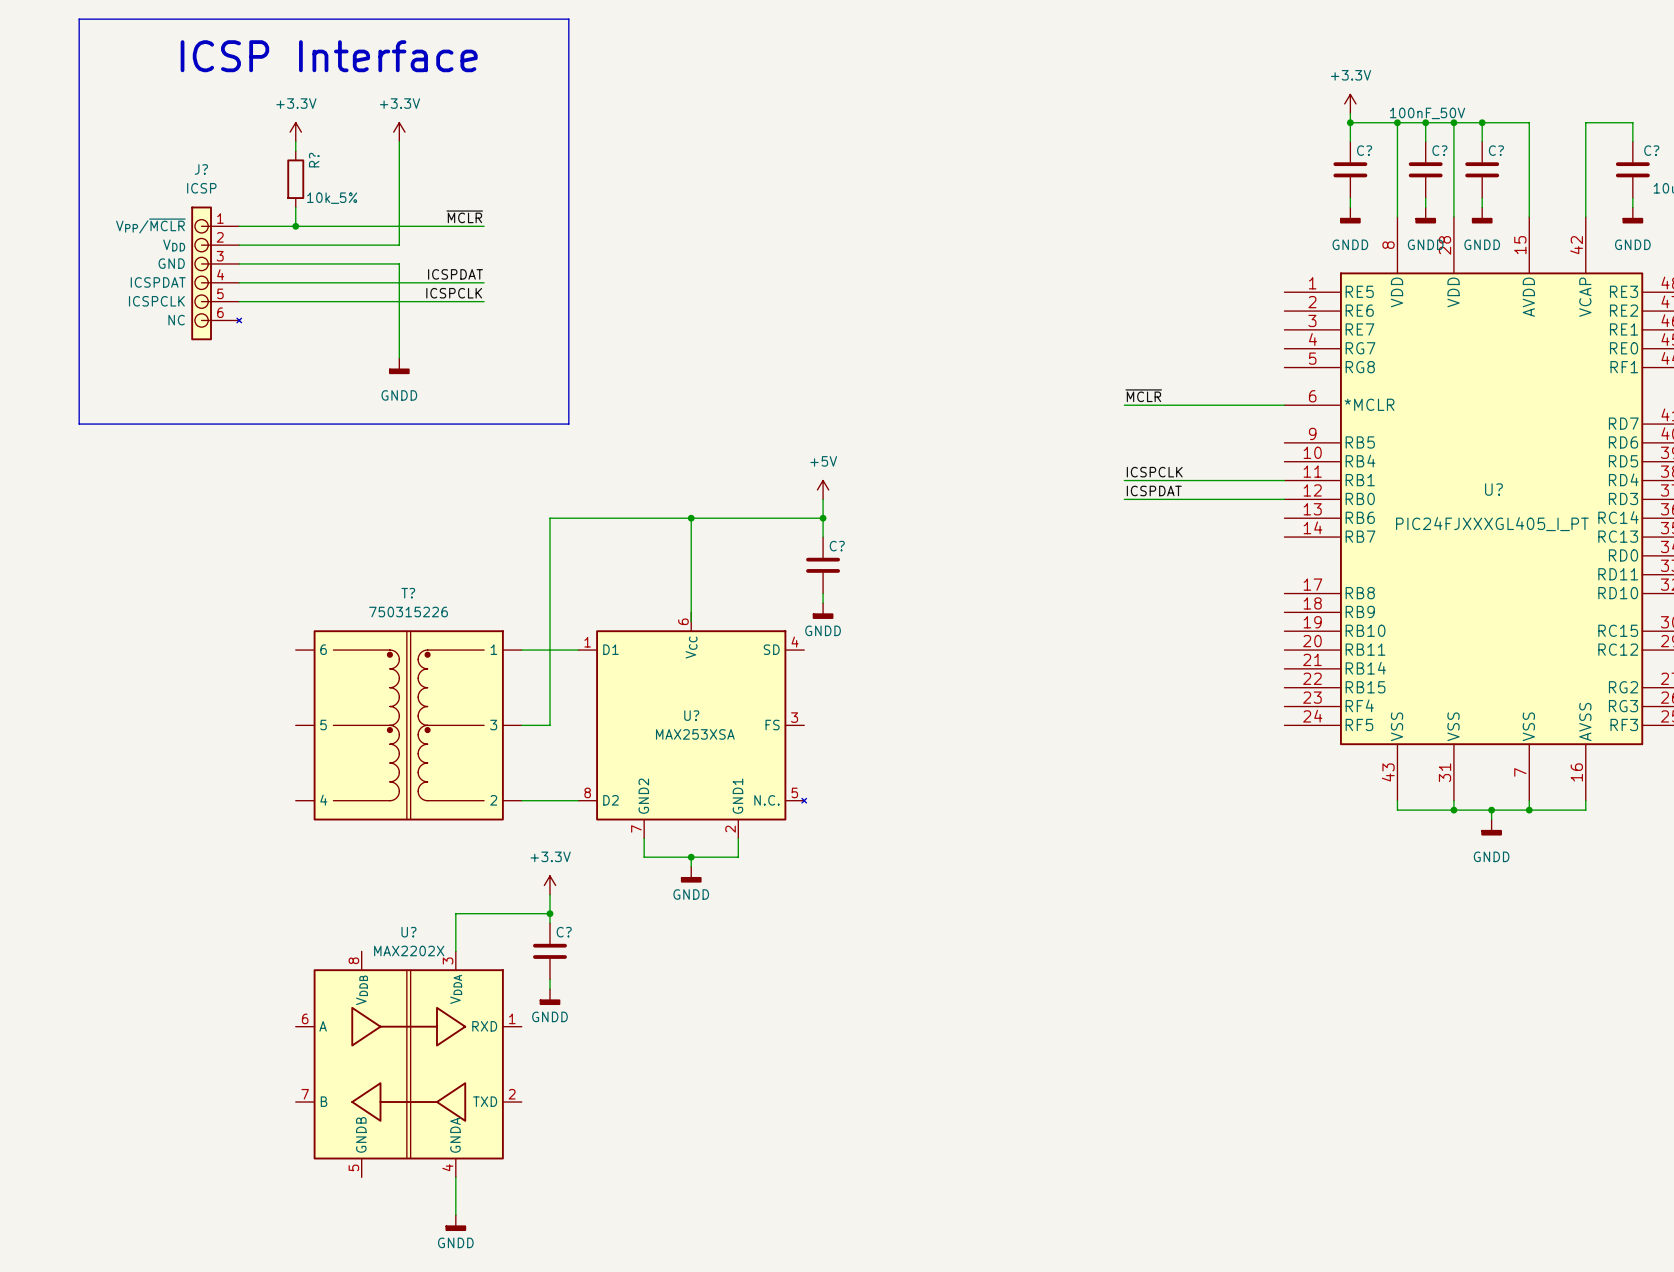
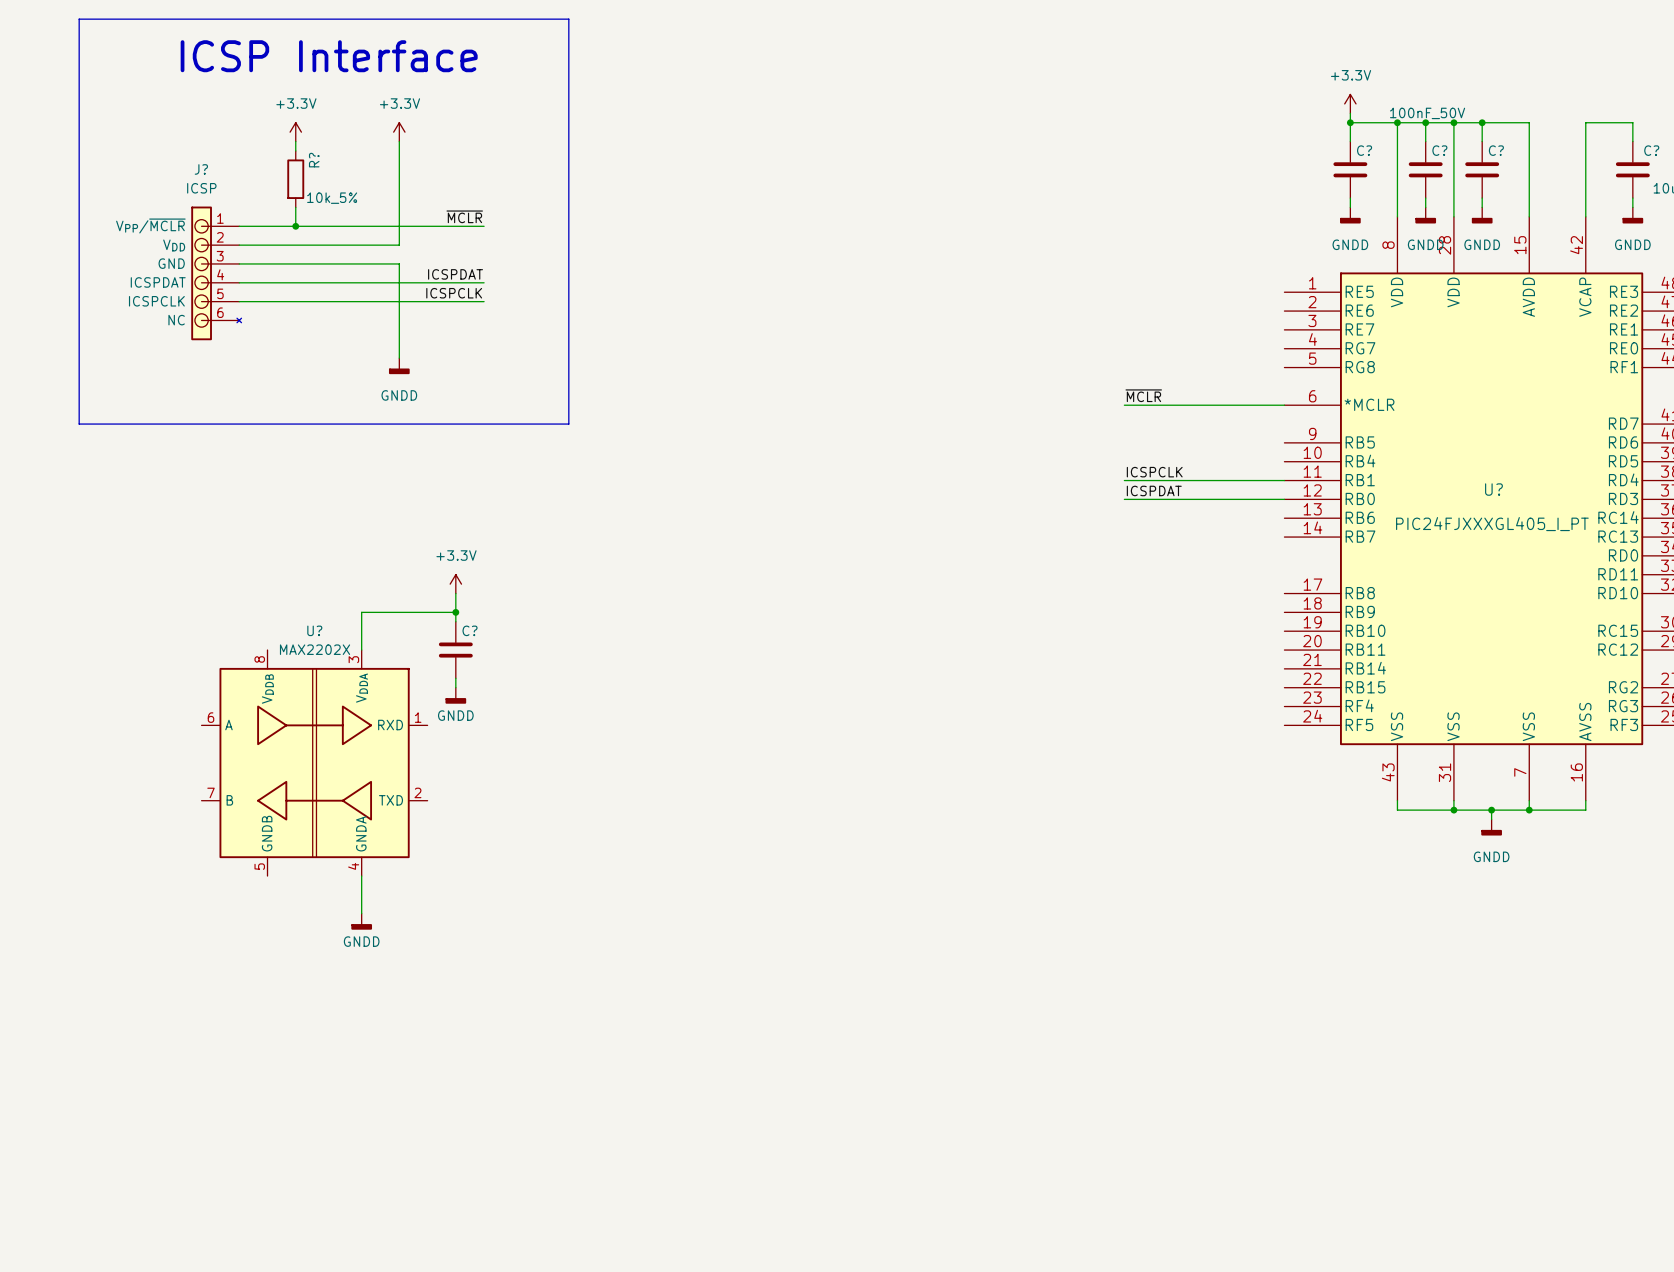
power symbol: +5V (823, 489) -> none
wire: (823, 499) (823, 537) -> none
wire: (691, 518) (691, 621) -> none
junction: (691, 518) -> none
wire: (823, 518) (549, 518) (549, 725) (521, 725) -> none
junction: (823, 518) -> none
C?: (823, 565) -> none
power symbol: none -> +3.3V (455, 584)
wire: none -> (455, 593) (455, 621)
wire: (823, 593) (823, 602) -> none
power symbol: GNDD (823, 610) -> none
wire: none -> (455, 612) (361, 612) (361, 650)
junction: none -> (455, 612)
C?: none -> (455, 650)
wire: (521, 650) (578, 650) -> none
power symbol: none -> GNDD (455, 695)
T?: 750315226 (408, 725) -> none
U?: MAX253XSA (692, 725) -> none
U?: none -> MAX2202X (314, 763)
wire: (521, 800) (578, 800) -> none
wire: (644, 838) (644, 857) (738, 857) (738, 838) -> none
wire: (691, 857) (691, 866) -> none
junction: (691, 857) -> none
power symbol: GNDD (691, 874) -> none
wire: none -> (361, 876) (361, 913)
power symbol: +3.3V (549, 885) -> none
wire: (549, 894) (549, 923) -> none
wire: (549, 913) (455, 913) (455, 951) -> none
junction: (549, 913) -> none
power symbol: none -> GNDD (361, 921)
C?: (549, 951) -> none
wire: (549, 979) (549, 989) -> none
power symbol: GNDD (549, 997) -> none
U?: MAX2202X (408, 1064) -> none
wire: (455, 1177) (455, 1215) -> none
power symbol: GNDD (455, 1223) -> none

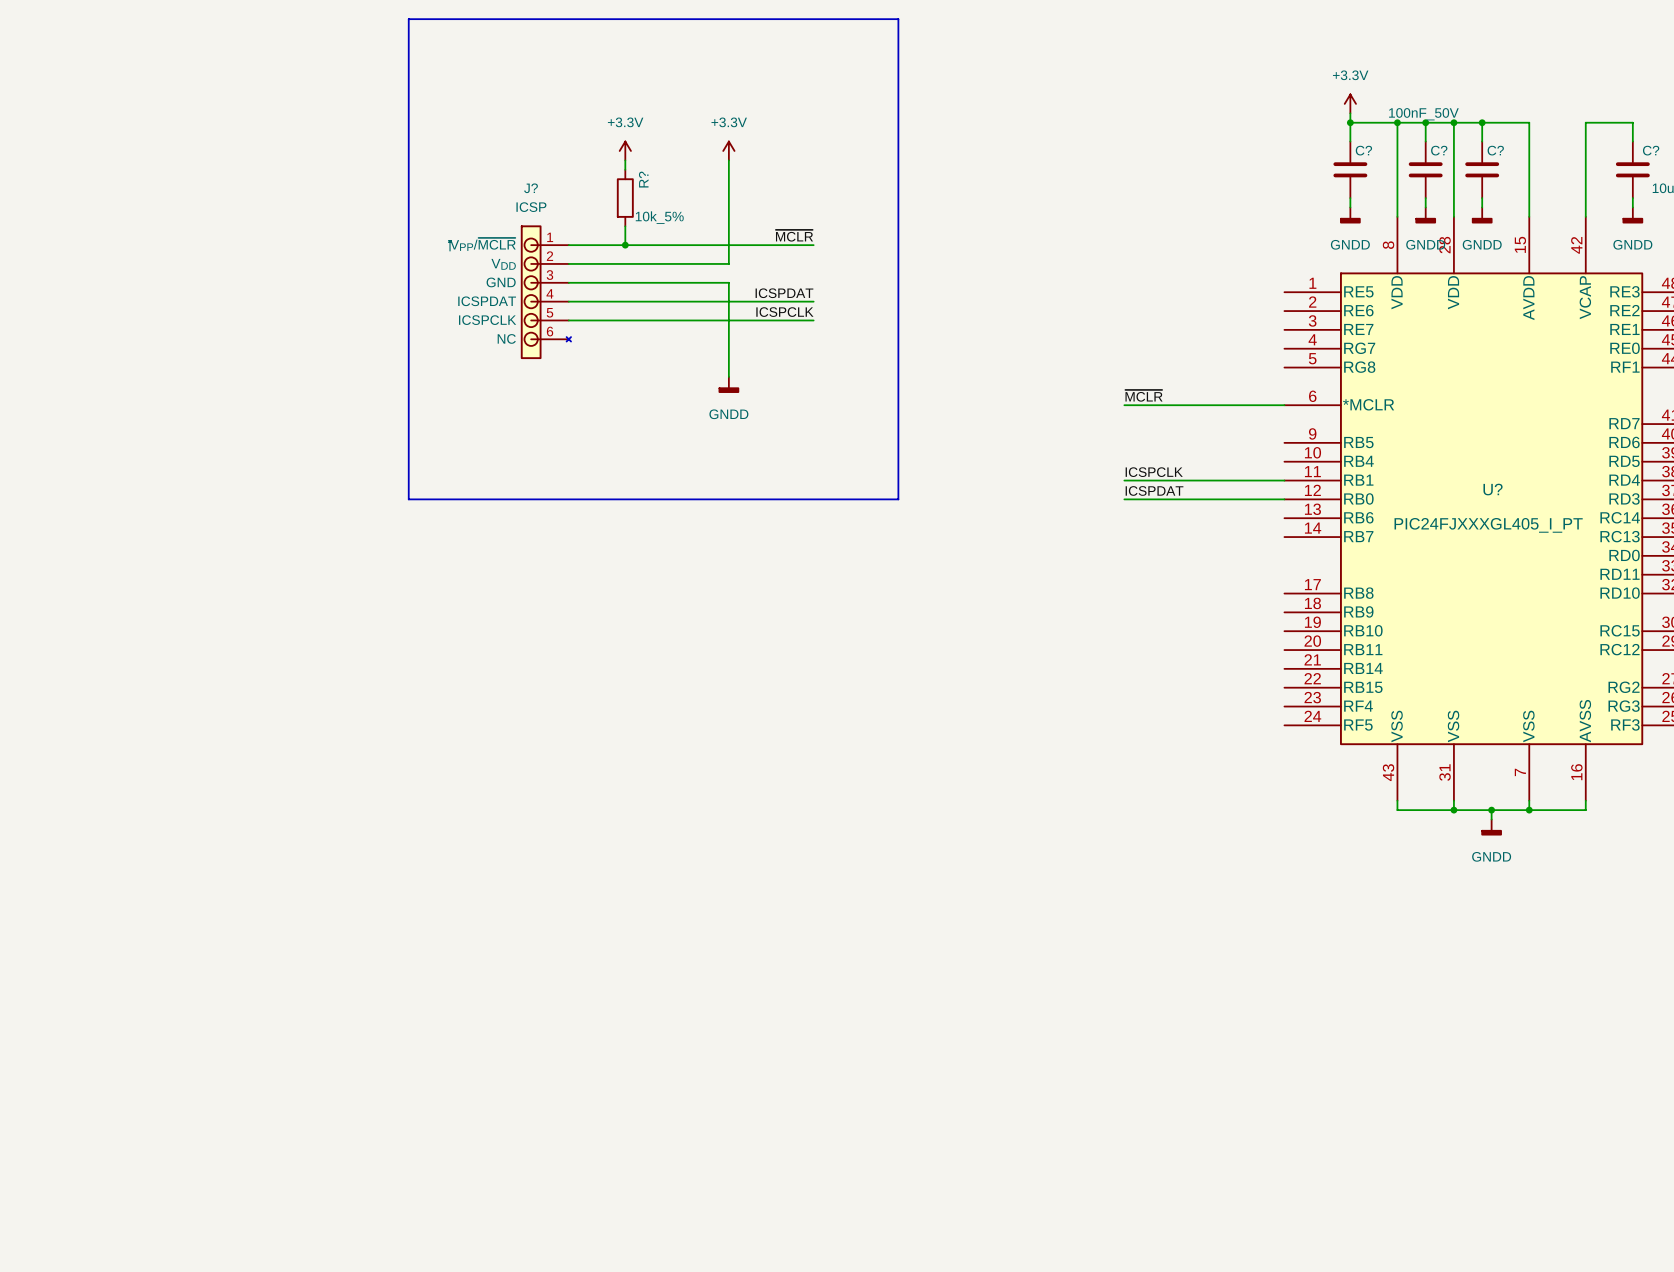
line: (408, 19) (79, 19) (79, 424) (568, 424) (568, 19) -> (408, 19) (408, 499) (898, 499) (898, 19) (568, 19)
text: ICSP Interface (329, 56) -> none
power symbol: +3.3V (295, 132) -> none
power symbol: +3.3V (399, 132) -> none
wire: (295, 141) (295, 150) -> none
wire: (399, 141) (399, 245) (239, 245) -> none
power symbol: none -> +3.3V (625, 150)
power symbol: none -> +3.3V (728, 150)
wire: none -> (625, 160) (625, 169)
wire: none -> (728, 160) (728, 263) (568, 263)
R?: 10k_5% (295, 179) -> none
R?: none -> 10k_5% (625, 198)
wire: (295, 207) (295, 226) -> none
label: ~{MCLR} (464, 216) -> none
wire: (239, 226) (484, 226) -> none
junction: (295, 226) -> none
wire: none -> (625, 226) (625, 245)
label: none -> ~{MCLR} (794, 235)
wire: none -> (568, 245) (813, 245)
junction: none -> (625, 245)
wire: (239, 263) (399, 263) (399, 358) -> none
J?: ICSP (216, 273) -> none
label: ICSPDAT (455, 274) -> none
wire: (239, 282) (484, 282) -> none
wire: none -> (568, 282) (728, 282) (728, 376)
J?: none -> ICSP (545, 292)
label: ICSPCLK (454, 293) -> none
label: none -> ICSPDAT (784, 293)
wire: (239, 301) (484, 301) -> none
wire: none -> (568, 301) (813, 301)
label: none -> ICSPCLK (784, 312)
wire: none -> (568, 320) (813, 320)
power symbol: GNDD (399, 366) -> none
power symbol: none -> GNDD (728, 384)
power symbol: +3.3V (455, 584) -> none
wire: (455, 593) (455, 621) -> none
wire: (455, 612) (361, 612) (361, 650) -> none
junction: (455, 612) -> none
C?: (455, 650) -> none
wire: (455, 678) (455, 687) -> none
power symbol: GNDD (455, 695) -> none
U?: MAX2202X (314, 763) -> none
wire: (361, 876) (361, 913) -> none
power symbol: GNDD (361, 921) -> none

